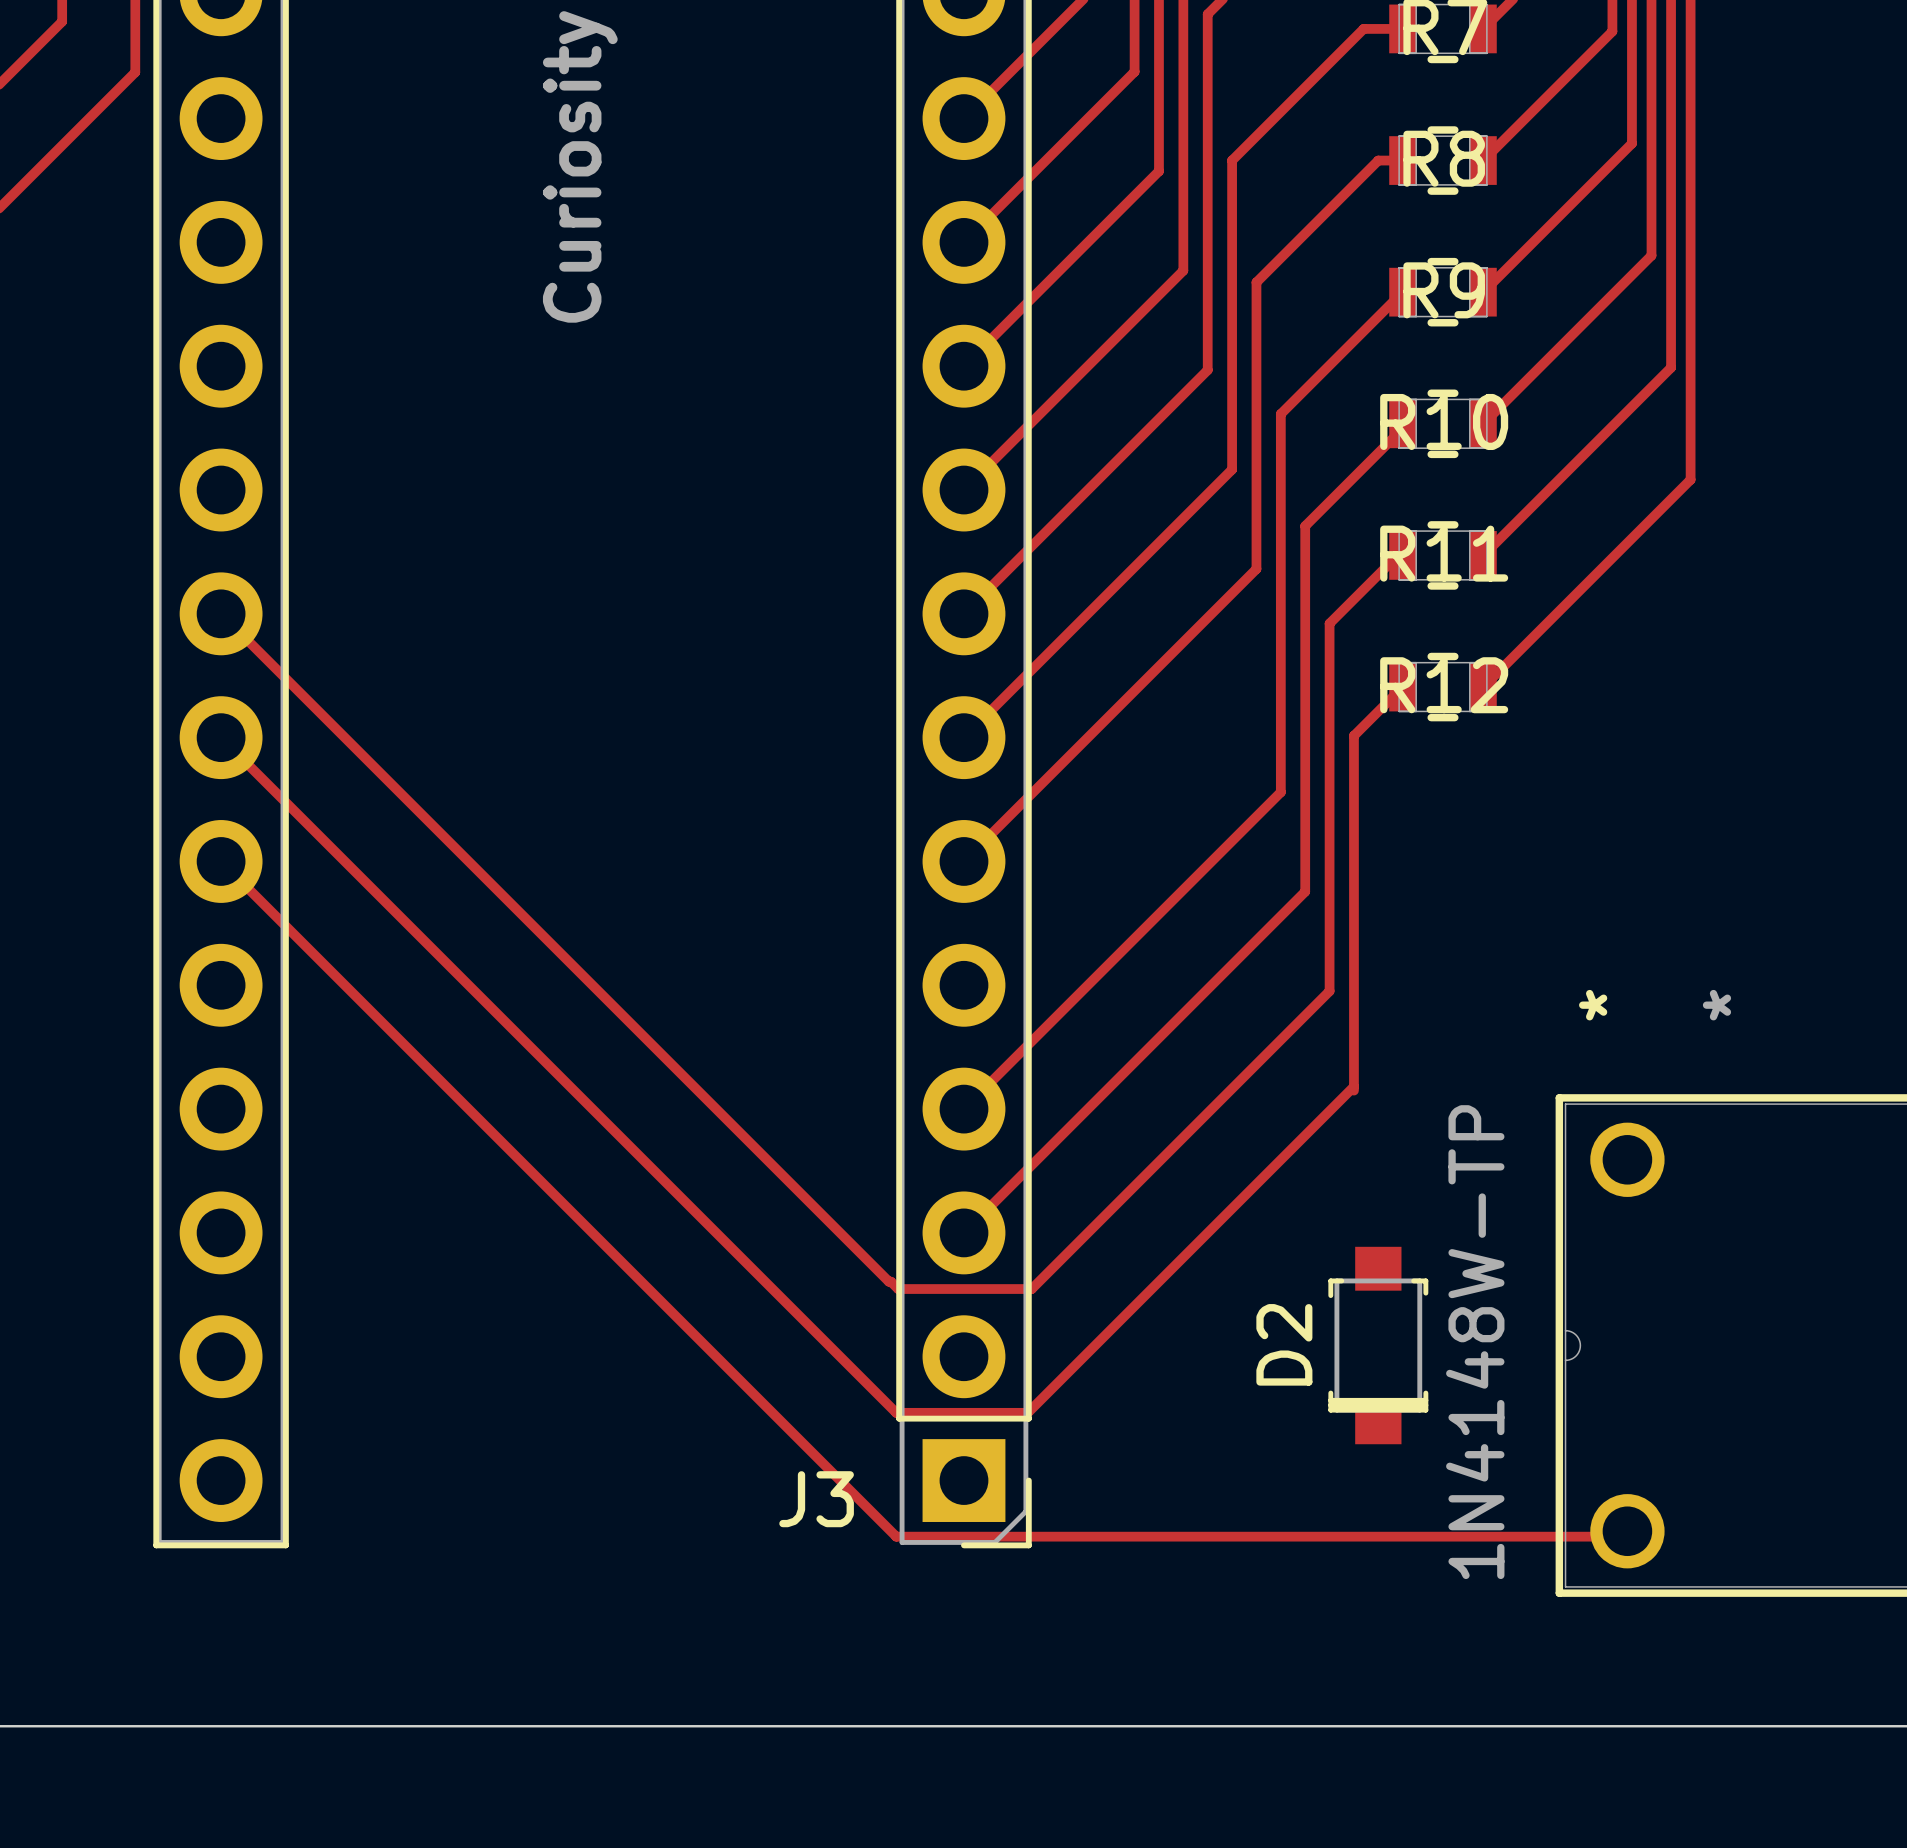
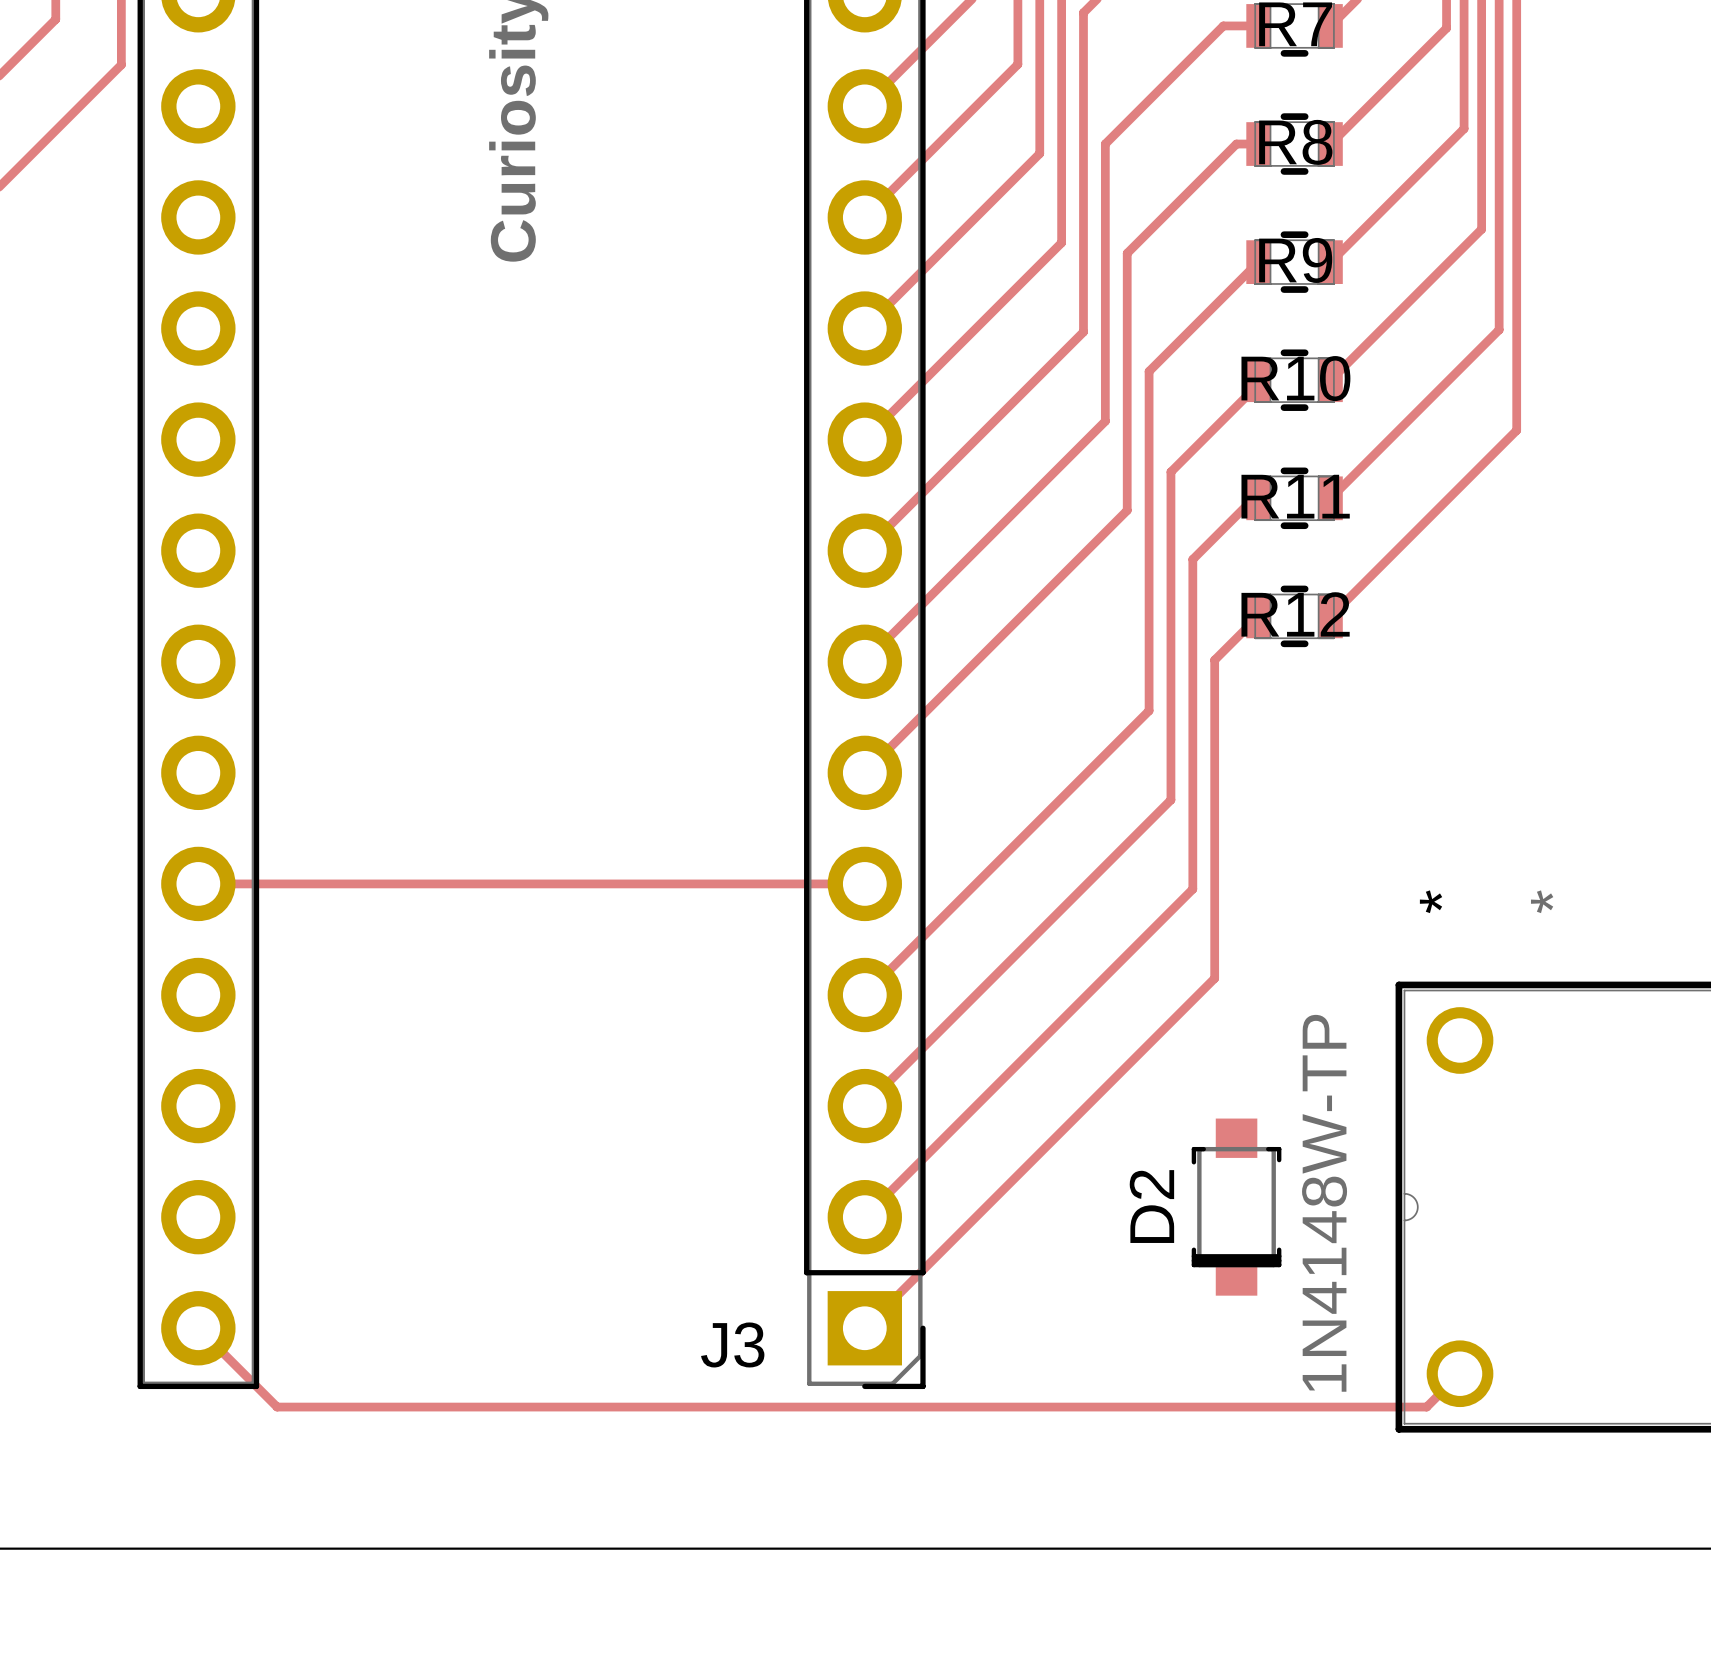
top track: (221, 613) (888, 1281) (898, 1289) (1031, 1289) -> (864, 1217) (925, 1156)
top track: (221, 737) (896, 1412) (1027, 1412) (1353, 1086) -> none
top track: (221, 861) (896, 1536) (1622, 1536) -> (198, 1328) (277, 1407) (1426, 1407) (1455, 1378)
top track: none -> (198, 883) (864, 883)
top track: none -> (1214, 978) (864, 1328)

